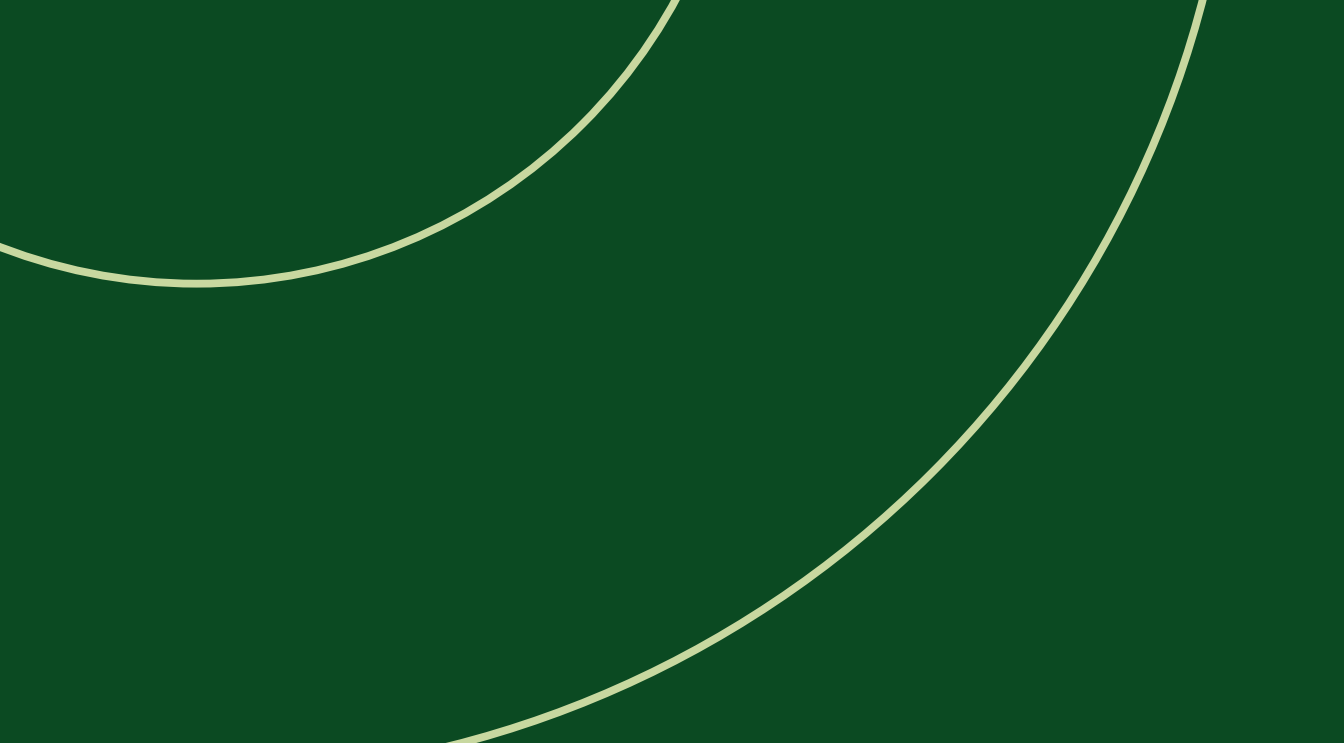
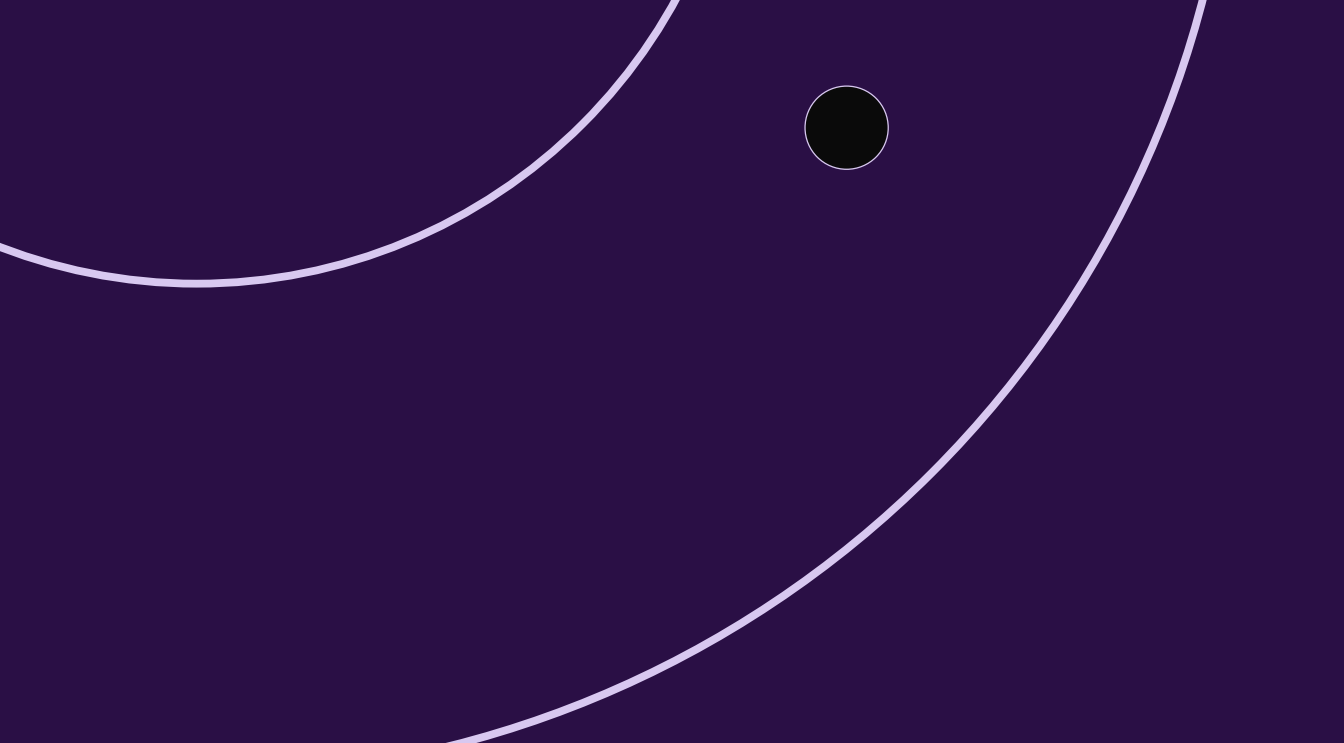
part: none -> (846, 127)

